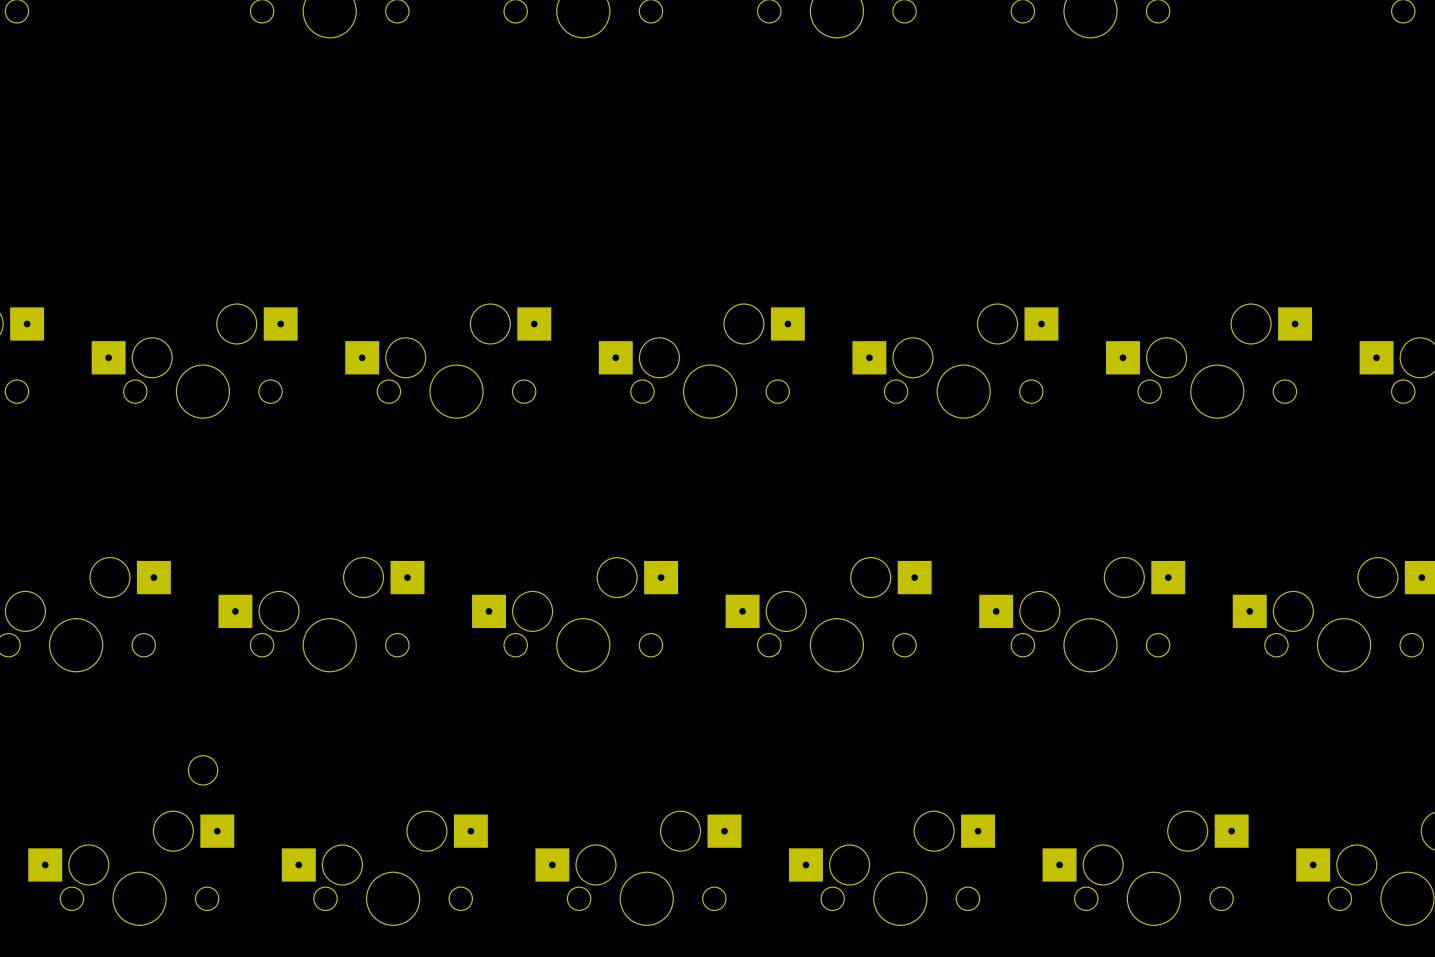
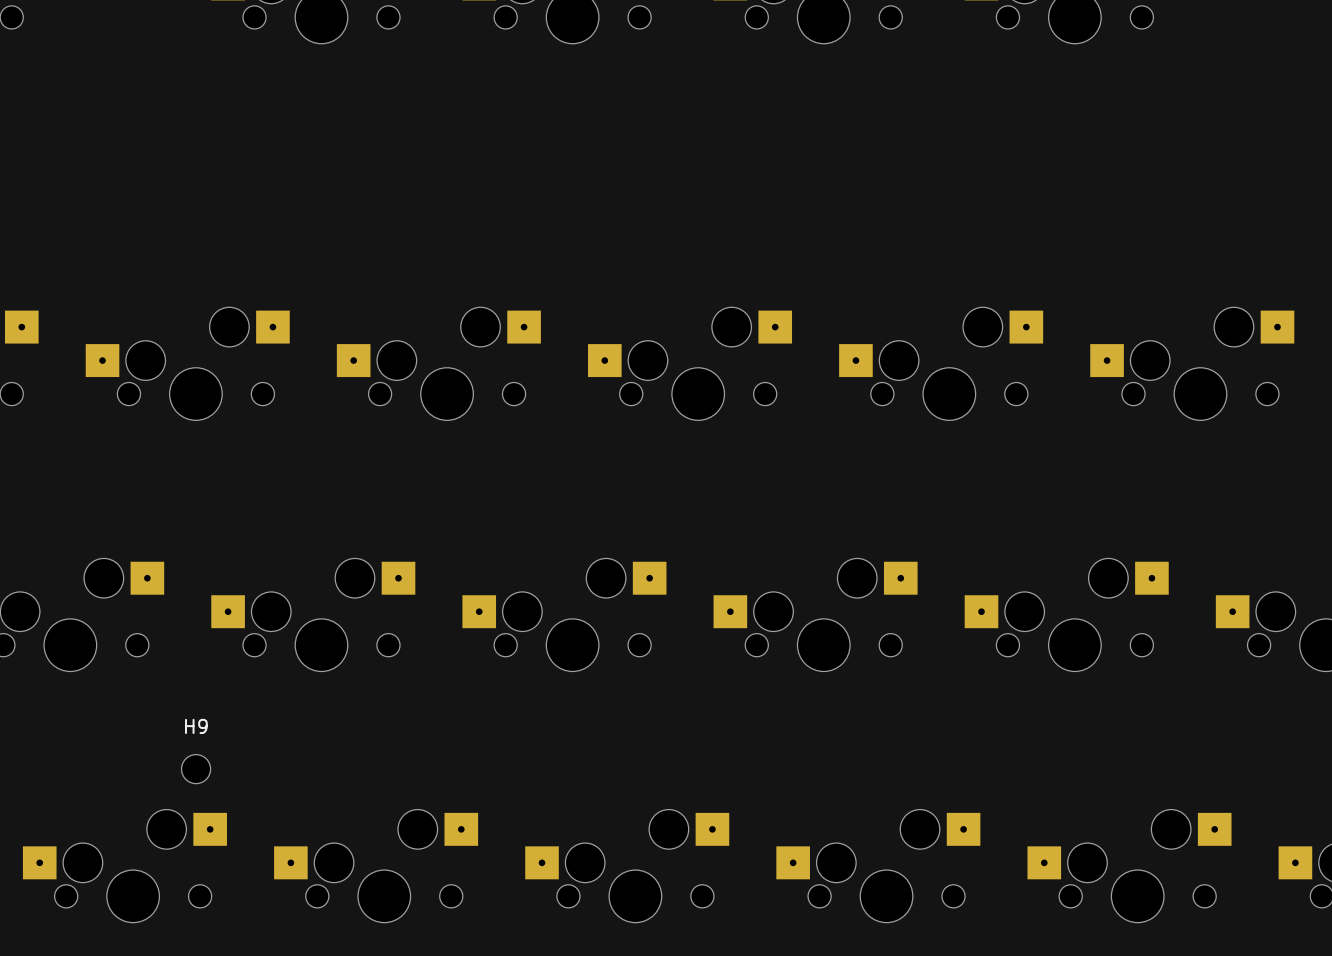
H9 name: none -> H9 (196, 726)

